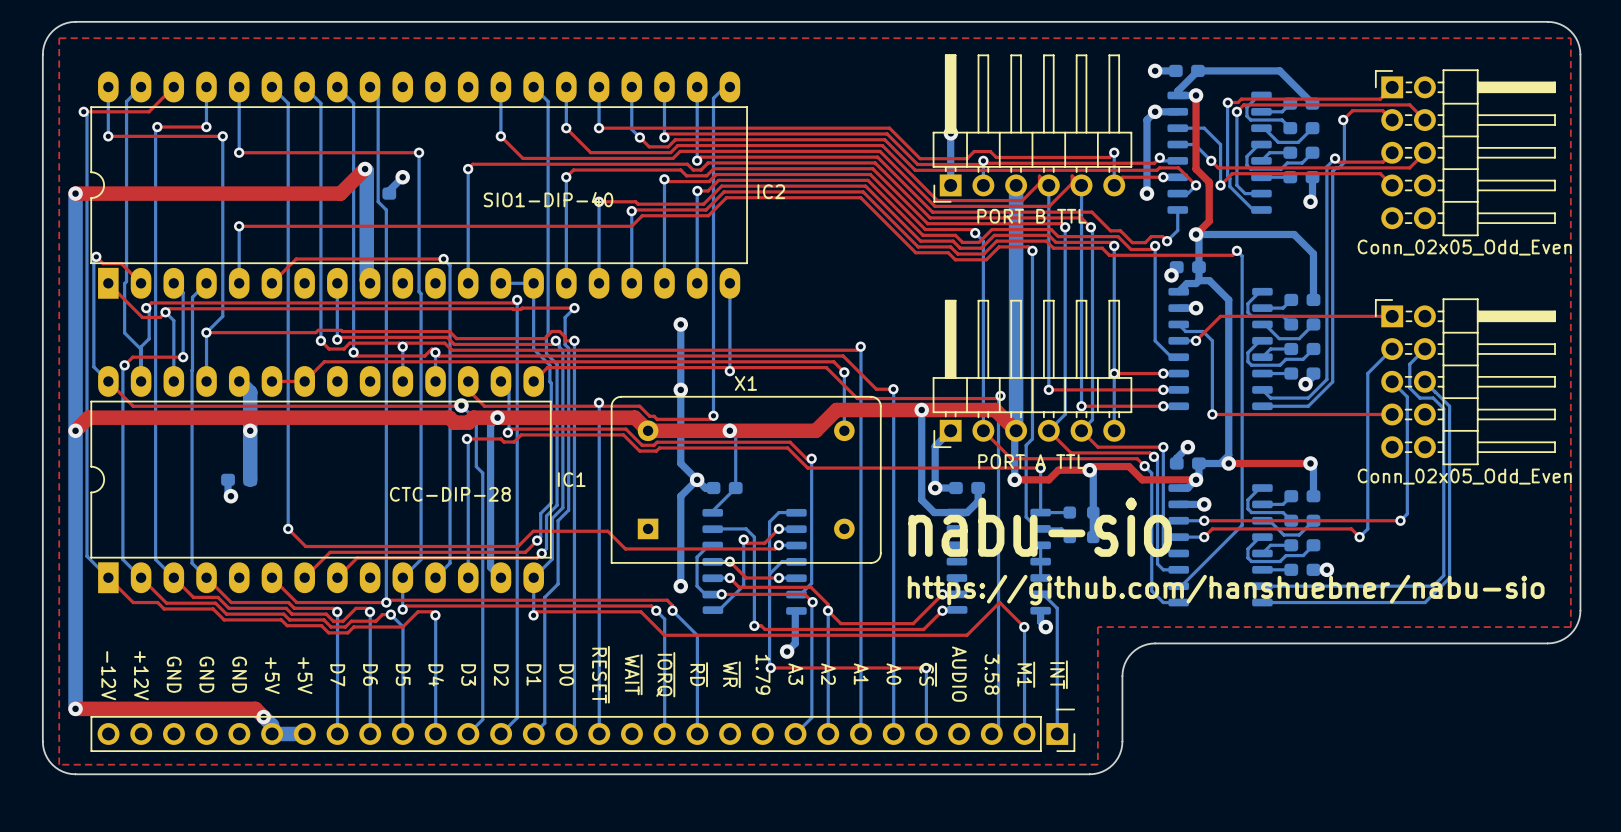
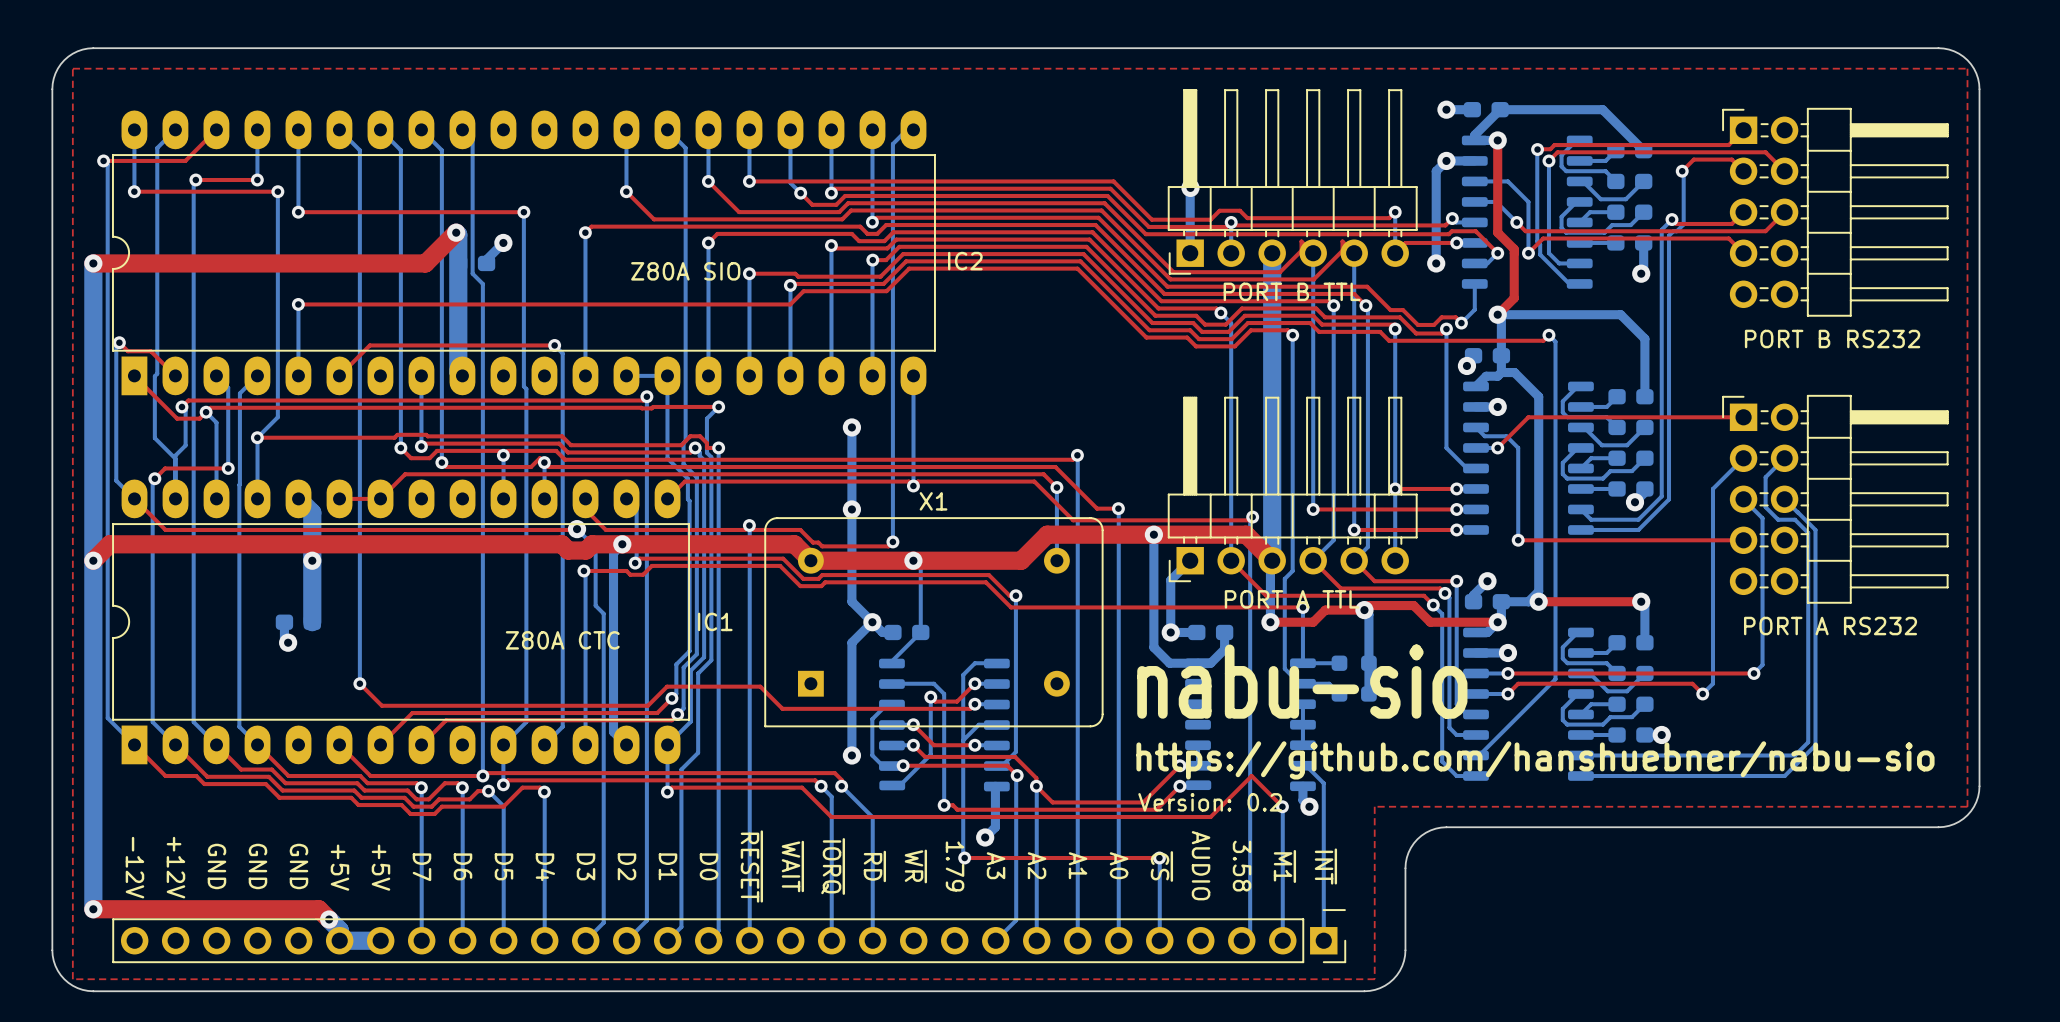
IC2 value: SIO1-DIP-40 (548, 199) -> Z80A SIO (685, 271)
part value: Conn_02x05_Odd_Even (1464, 247) -> PORT B RS232 (1832, 339)
part value: Conn_02x05_Odd_Even (1464, 476) -> PORT A RS232 (1830, 626)
IC1 value: CTC-DIP-28 (450, 494) -> Z80A CTC (562, 640)
text: none -> Version: 0.2 (1210, 802)

